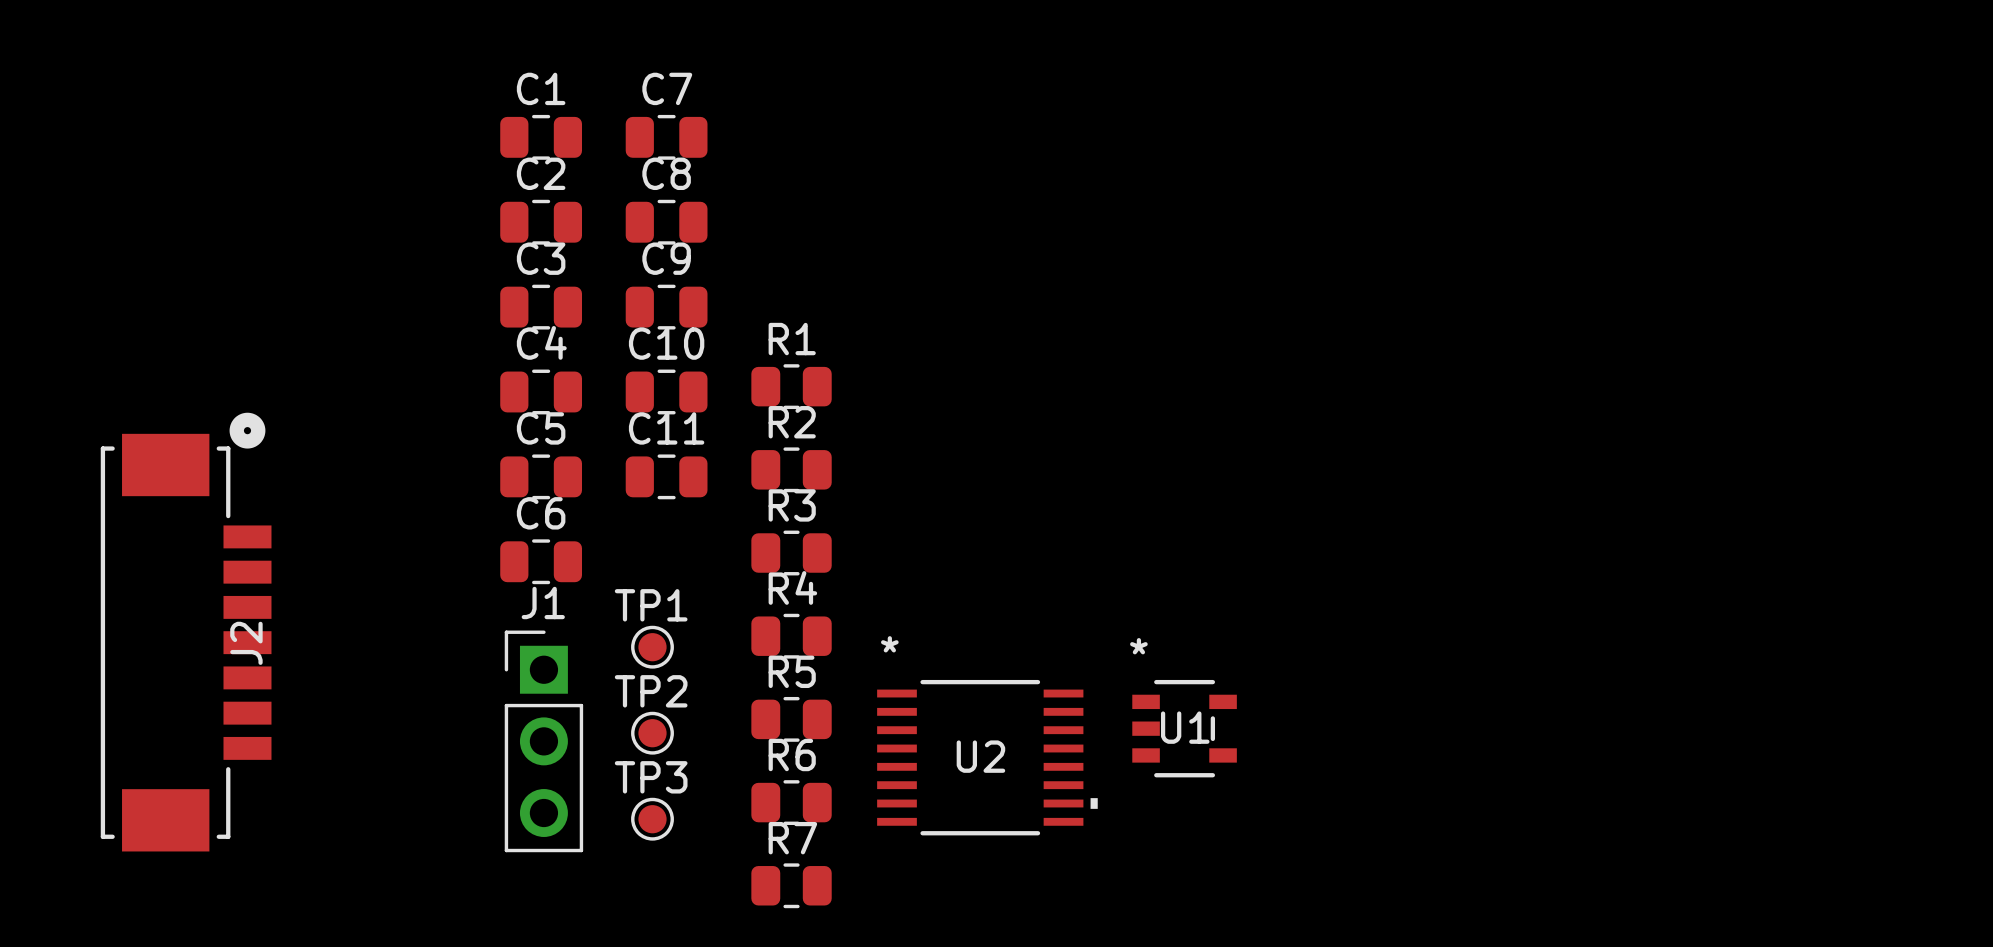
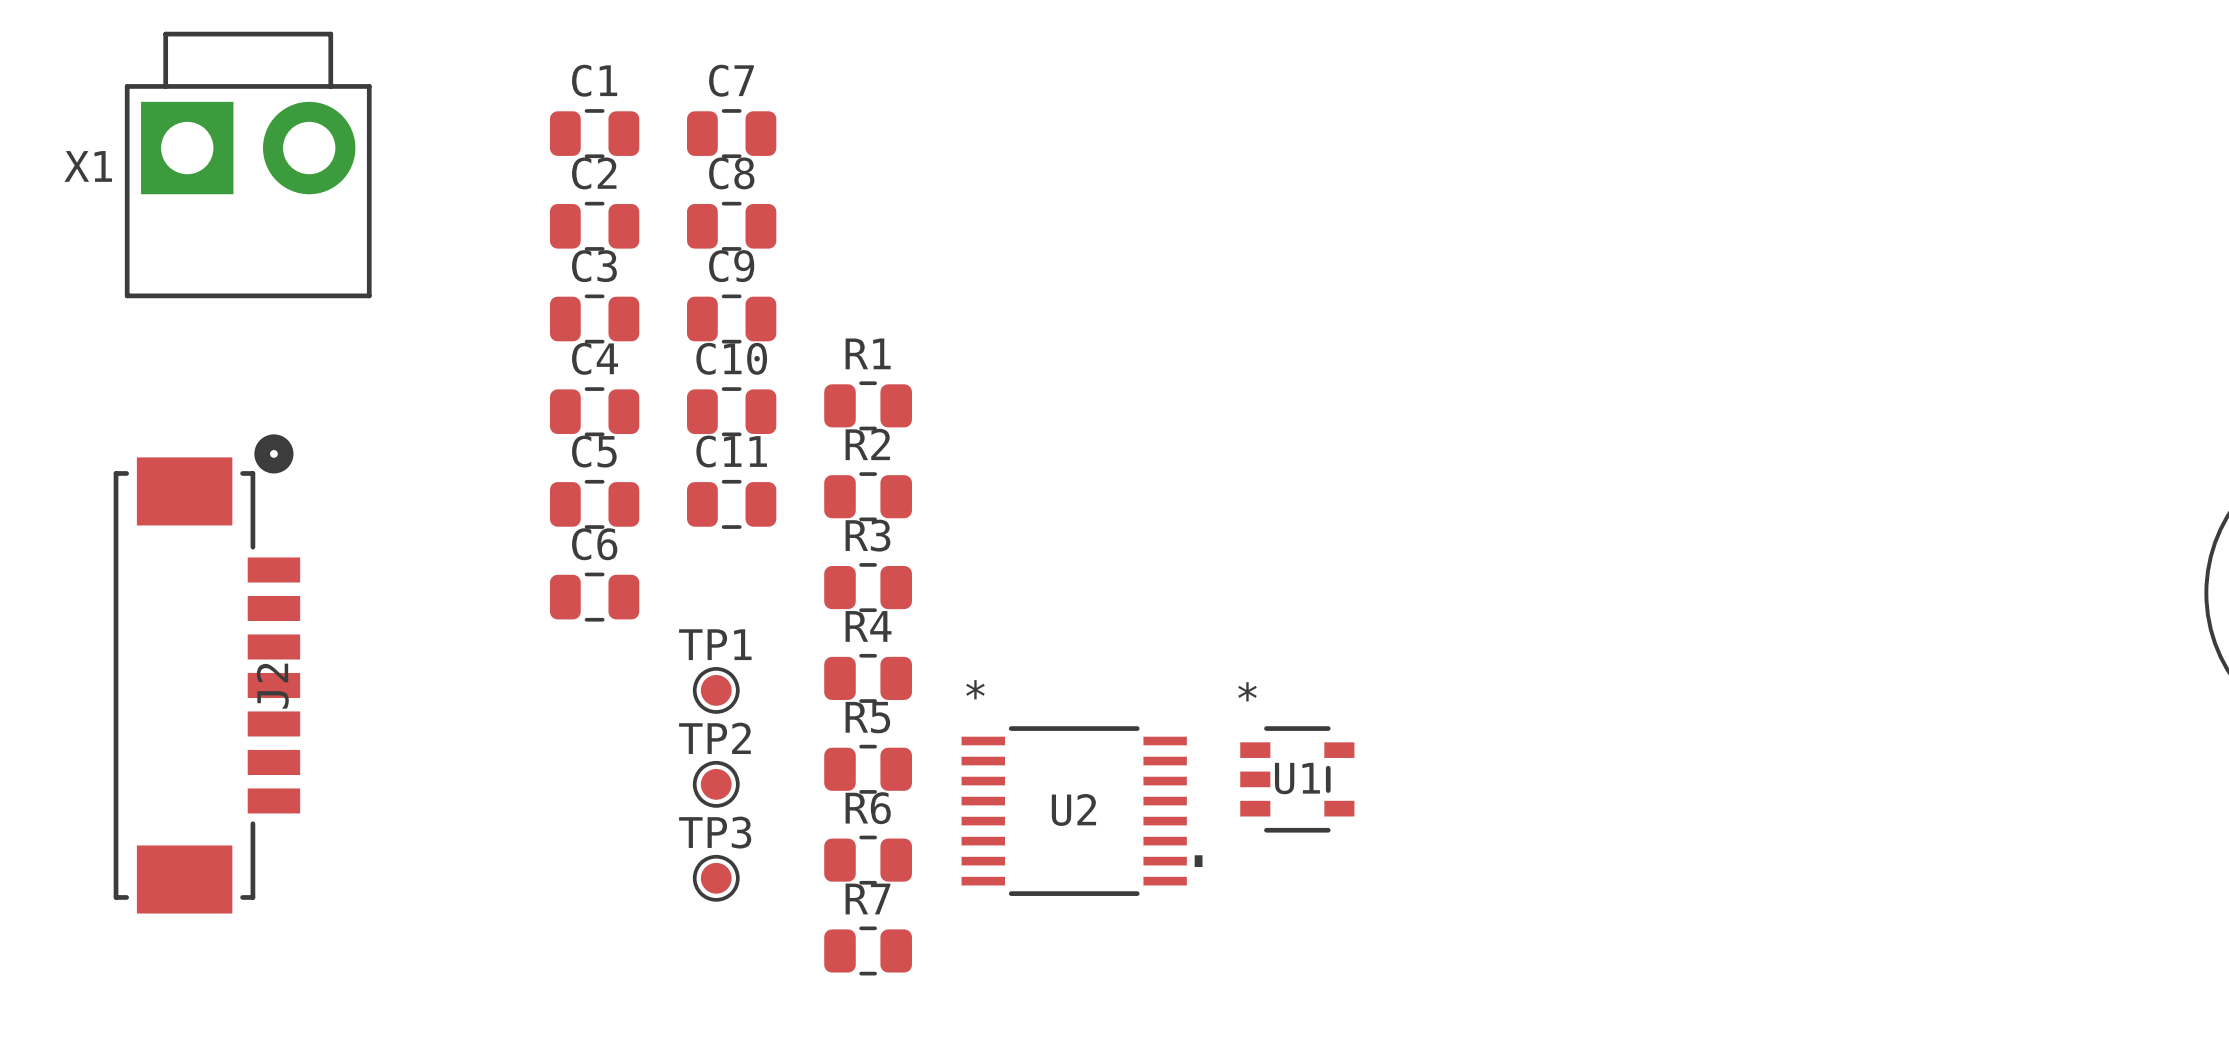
X1: none -> (248, 164)
J1: (543, 741) -> none

